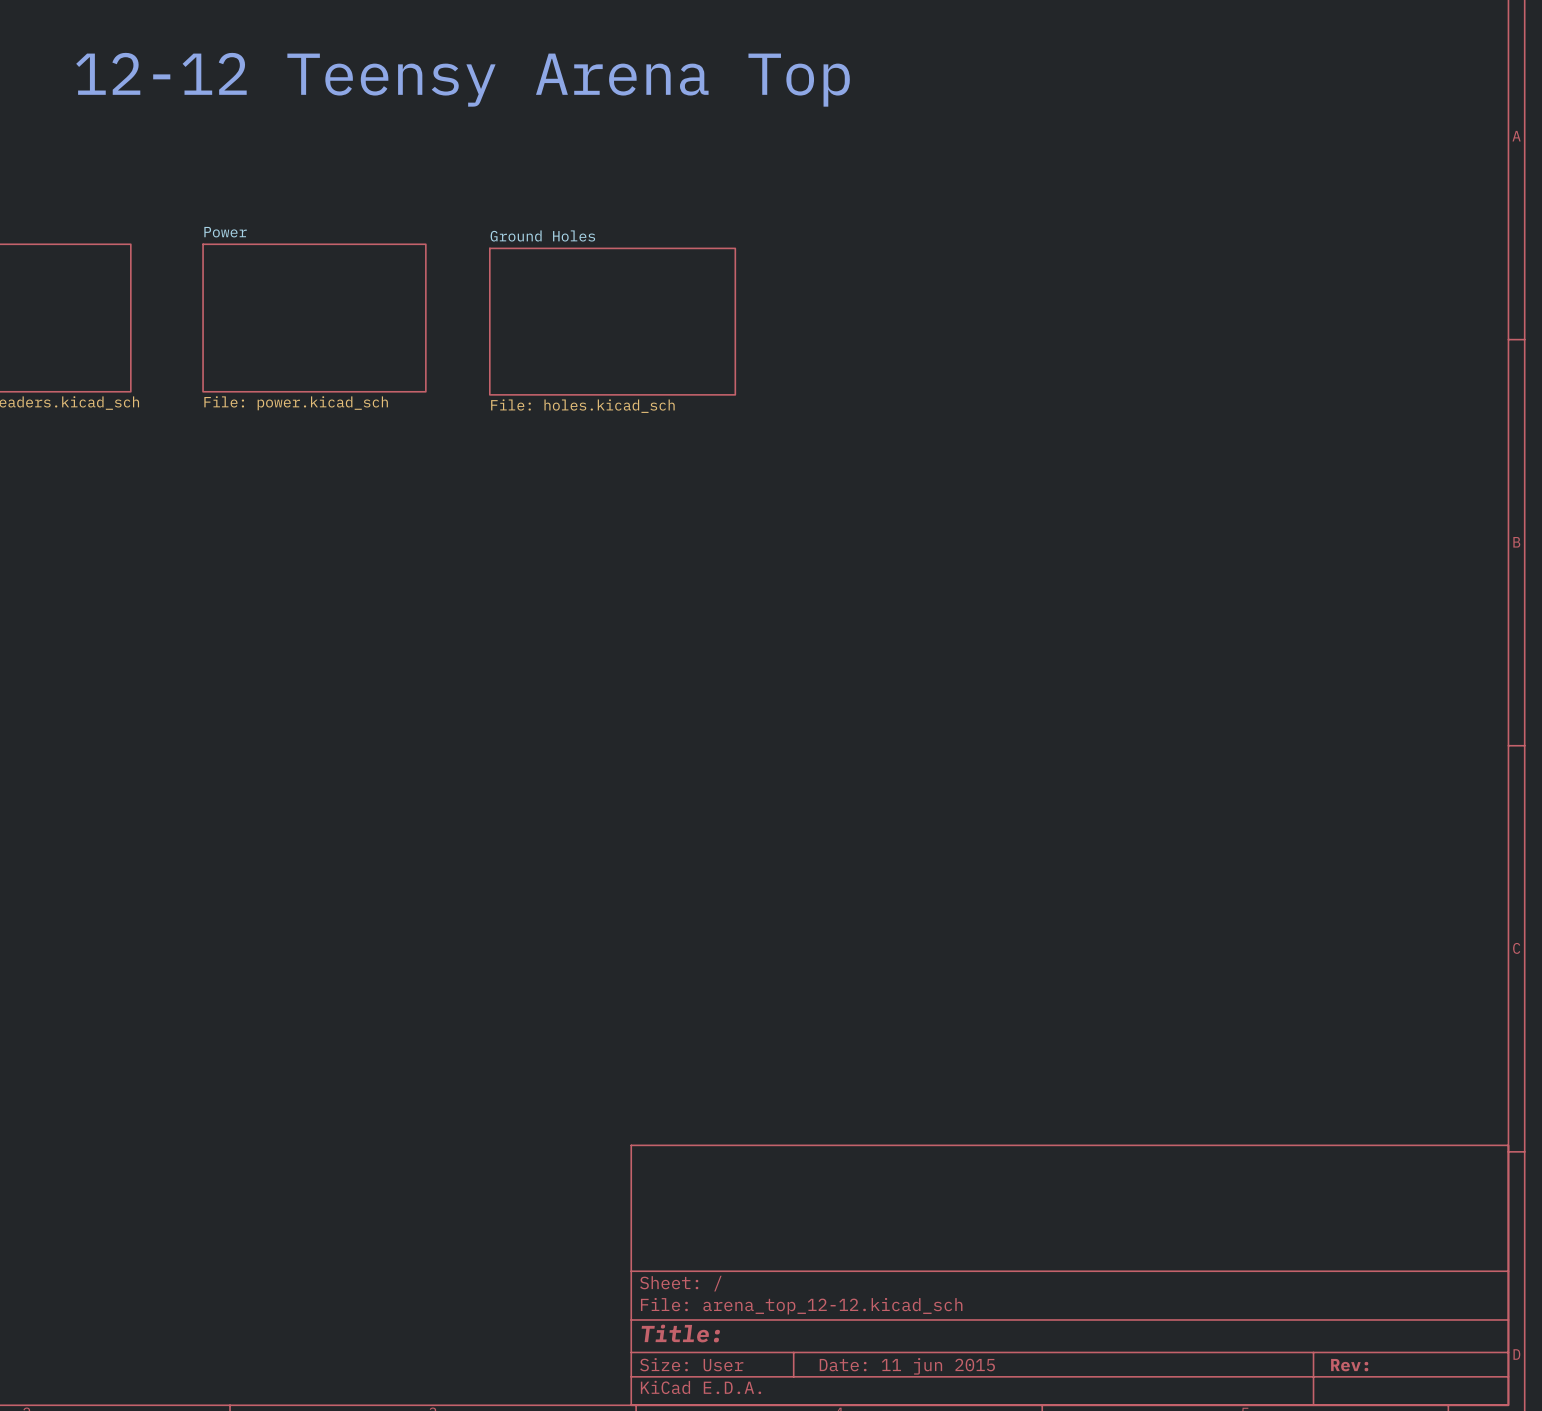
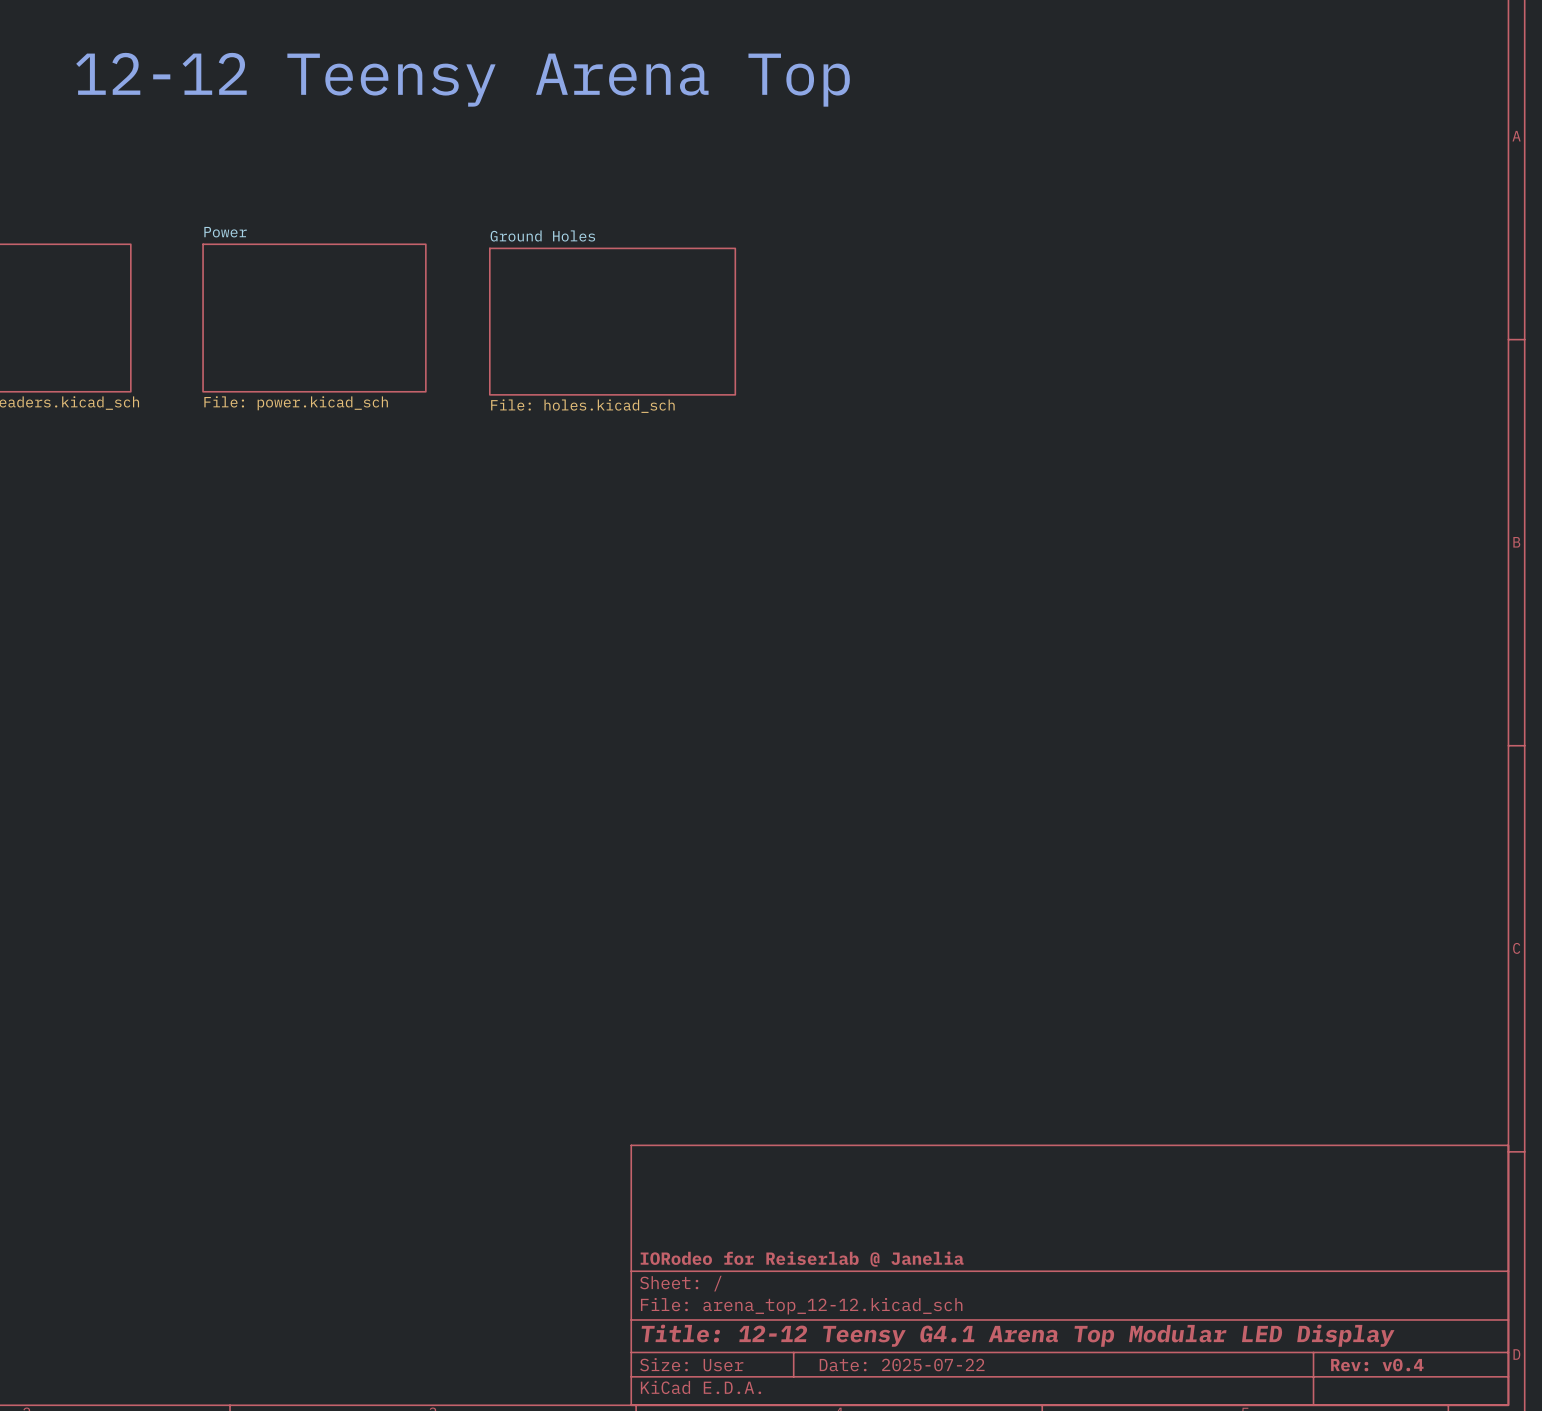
title block: none -> IORodeo for Reiserlab @ Janelia (802, 1259)
title block: Title: (680, 1333) -> Title: 12-12 Teensy G4.1 Arena Top Modular LED Display (1018, 1335)
title block: Rev: (1349, 1365) -> Rev: v0.4 (1377, 1365)
title block: Date: 11 jun 2015 (907, 1366) -> Date: 2025-07-22 (902, 1365)

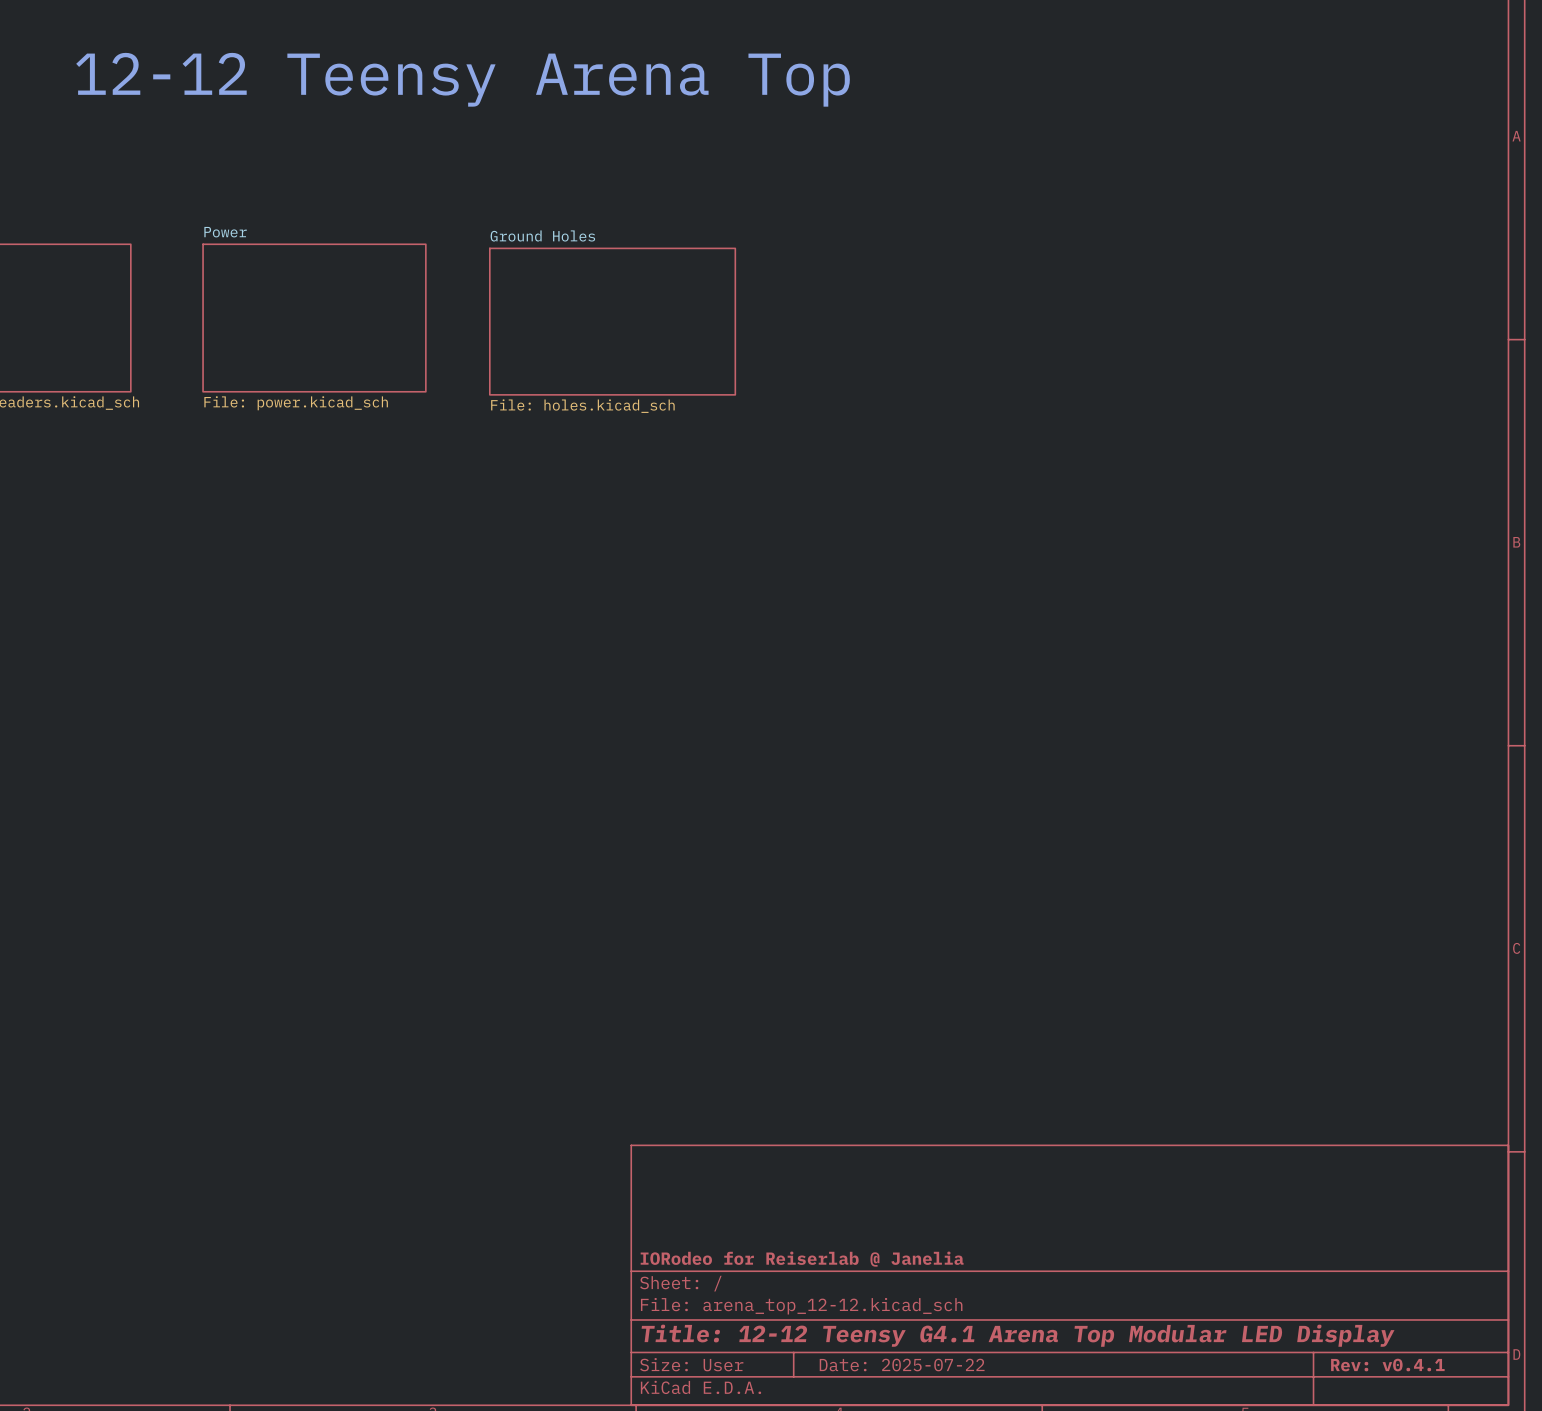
title block: Rev: v0.4 (1377, 1365) -> Rev: v0.4.1 (1387, 1365)

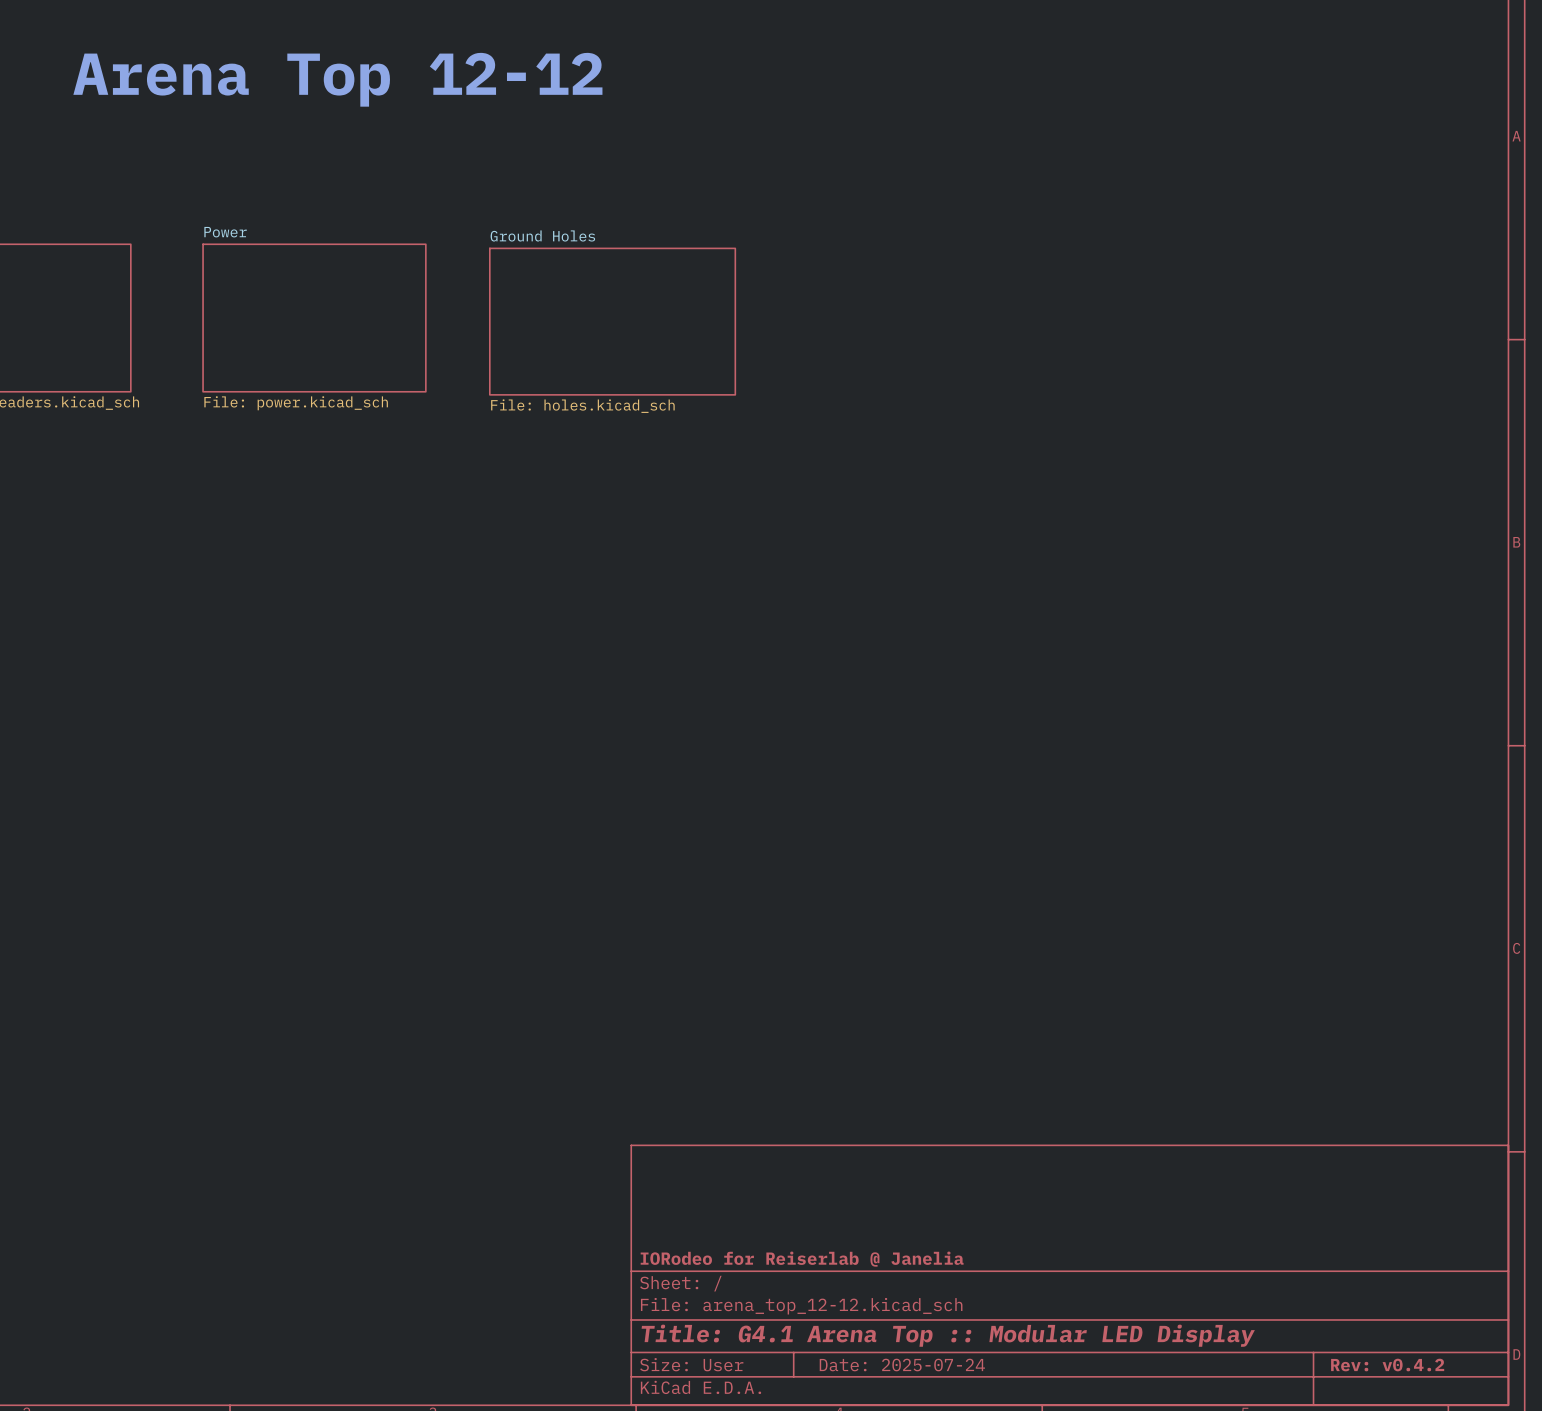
text: 12-12 Teensy Arena Top (463, 79) -> Arena Top 12-12 (337, 79)
title block: Title: 12-12 Teensy G4.1 Arena Top Modular LED Display (1018, 1335) -> Title: G4.1 Arena Top :: Modular LED Display (948, 1335)
title block: Date: 2025-07-22 (902, 1365) -> Date: 2025-07-24 (902, 1365)
title block: Rev: v0.4.1 (1387, 1365) -> Rev: v0.4.2 (1387, 1365)

